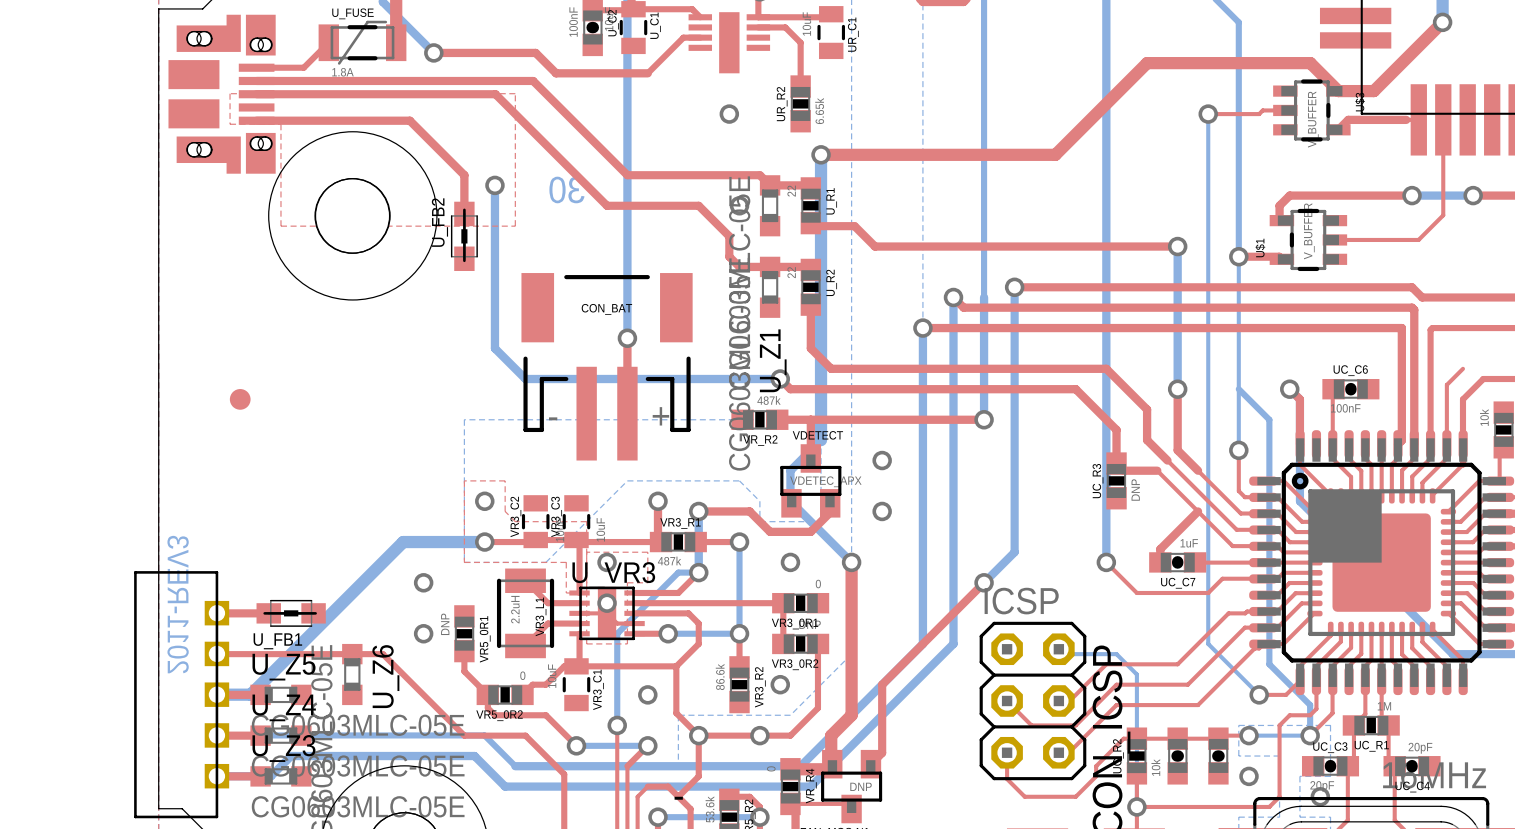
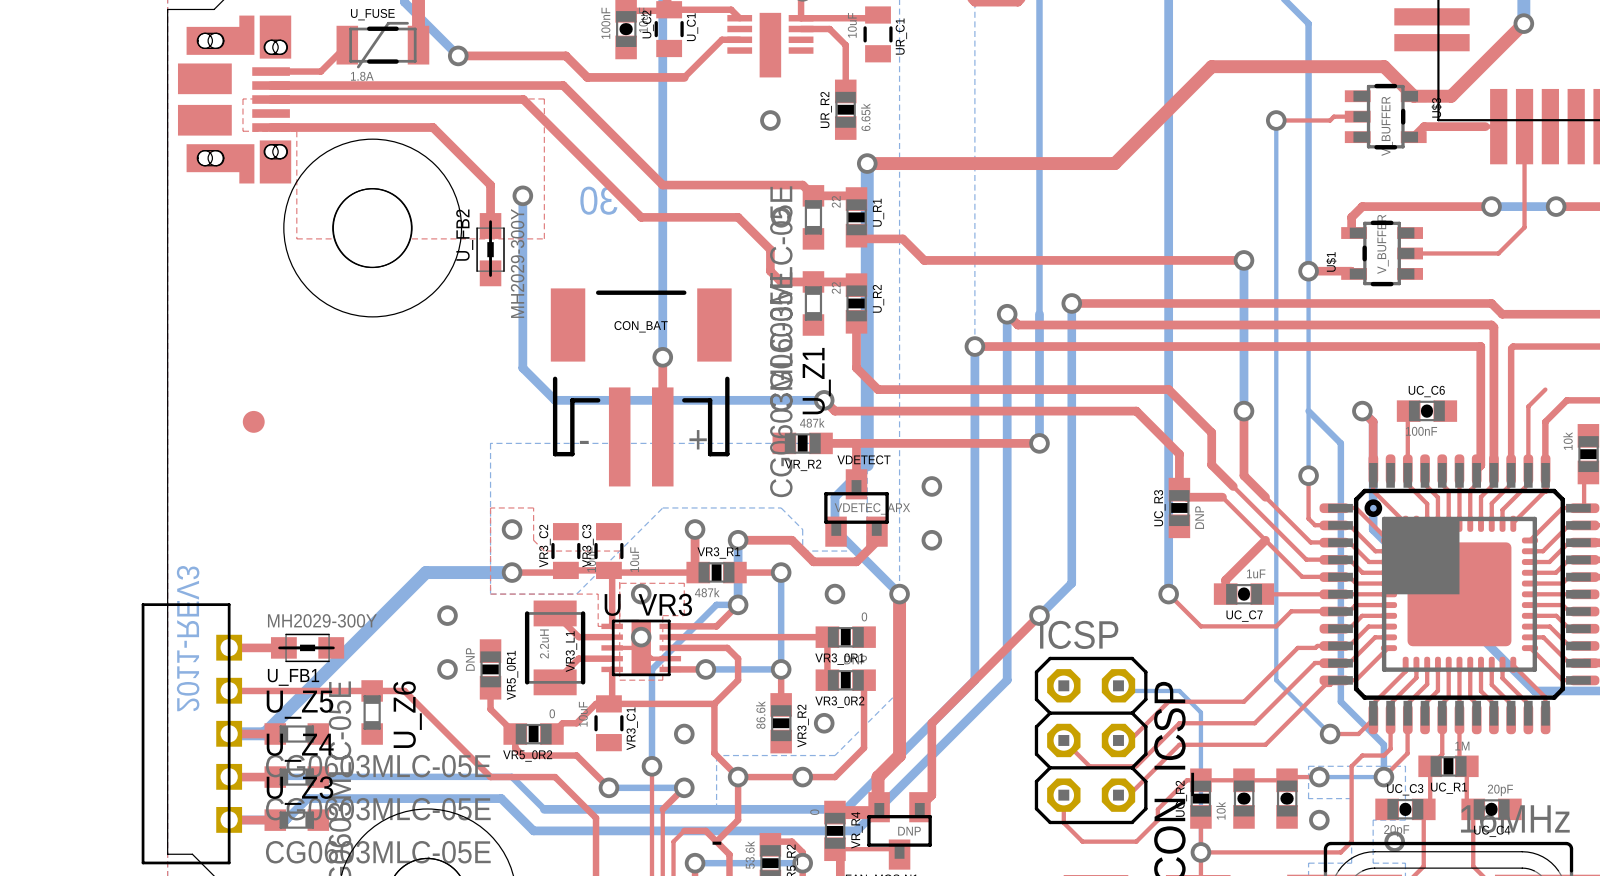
U_FB2 value: none -> MH2029-300Y (517, 263)
U_FB1 value: none -> MH2029-300Y (322, 620)

